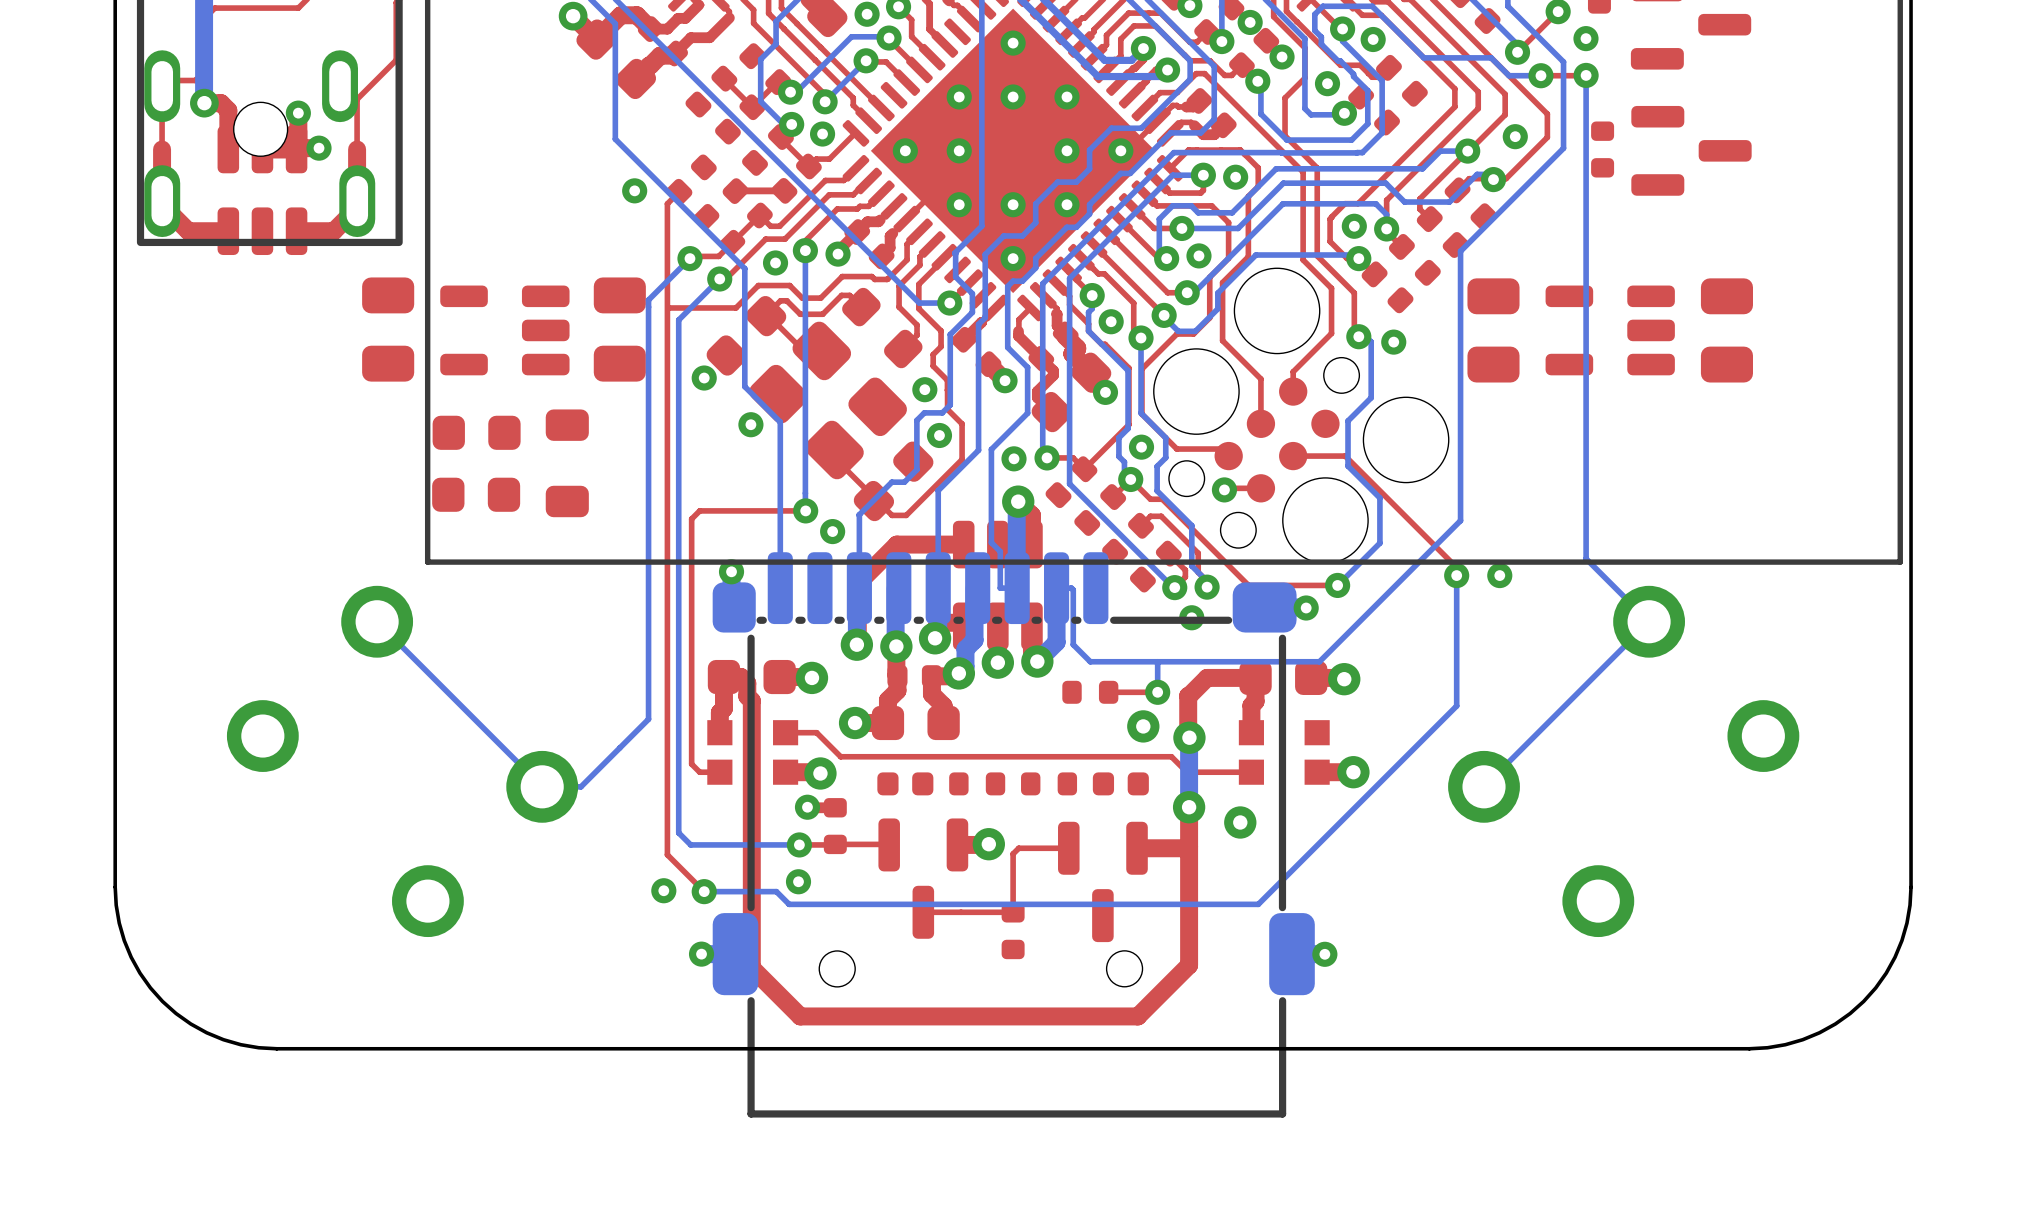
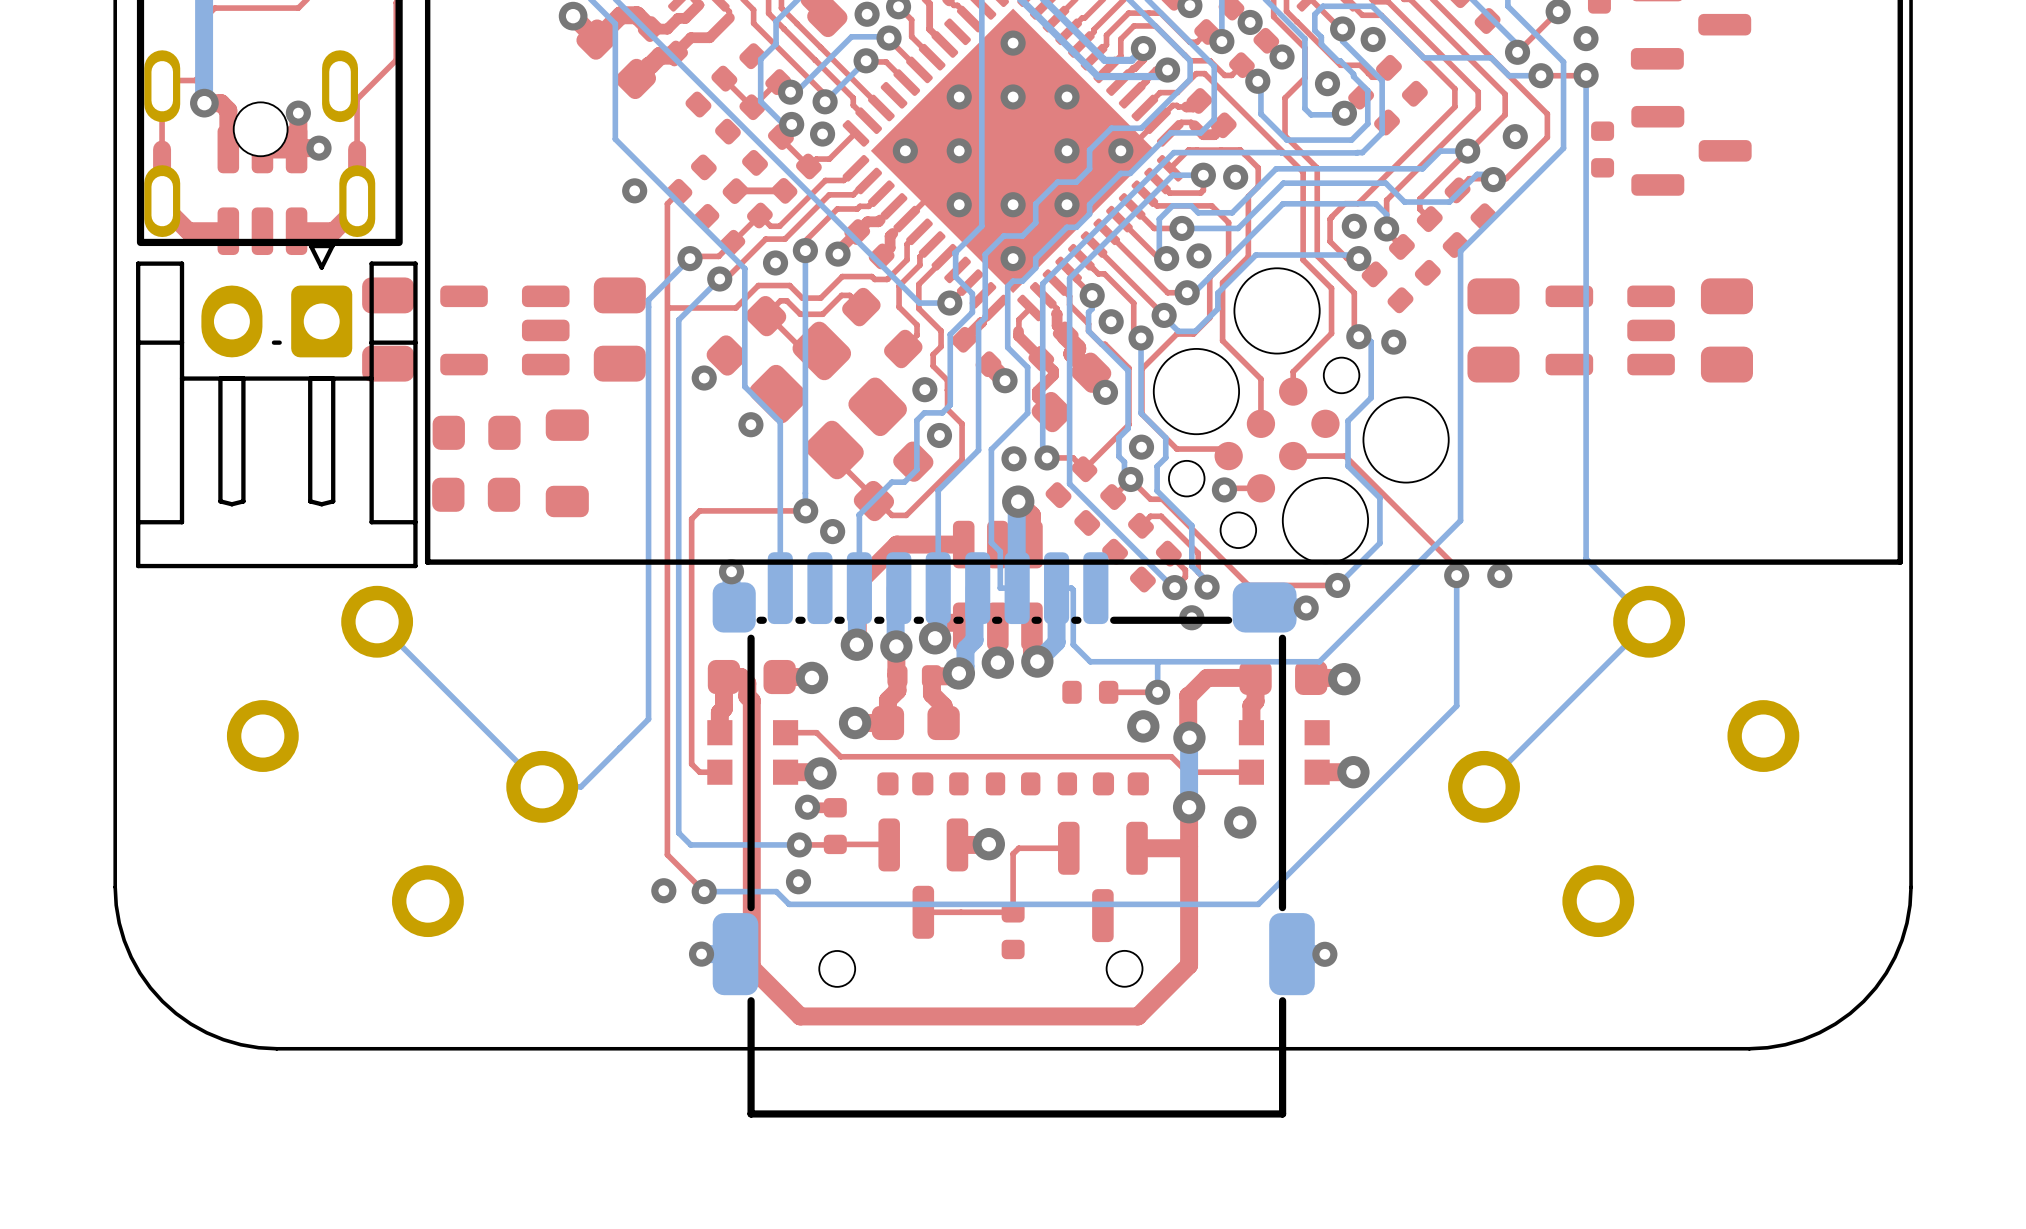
part: none -> (276, 406)

